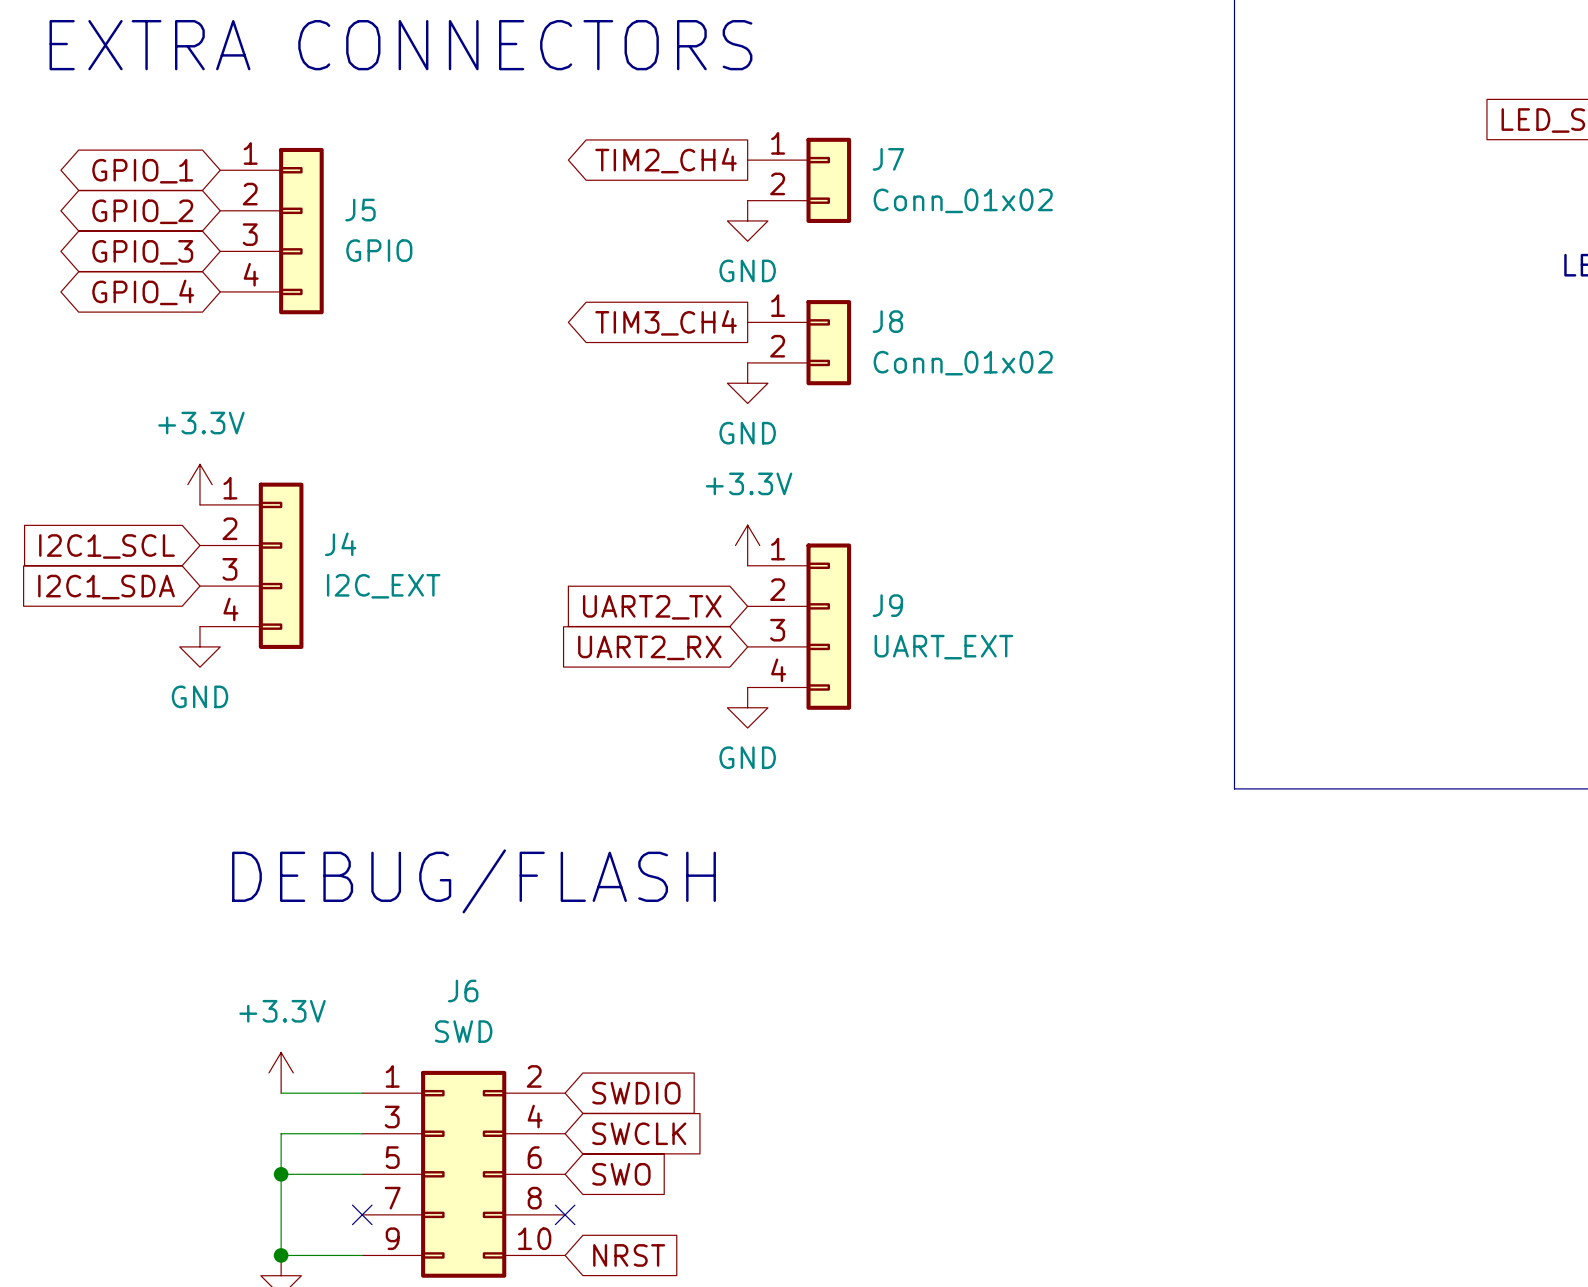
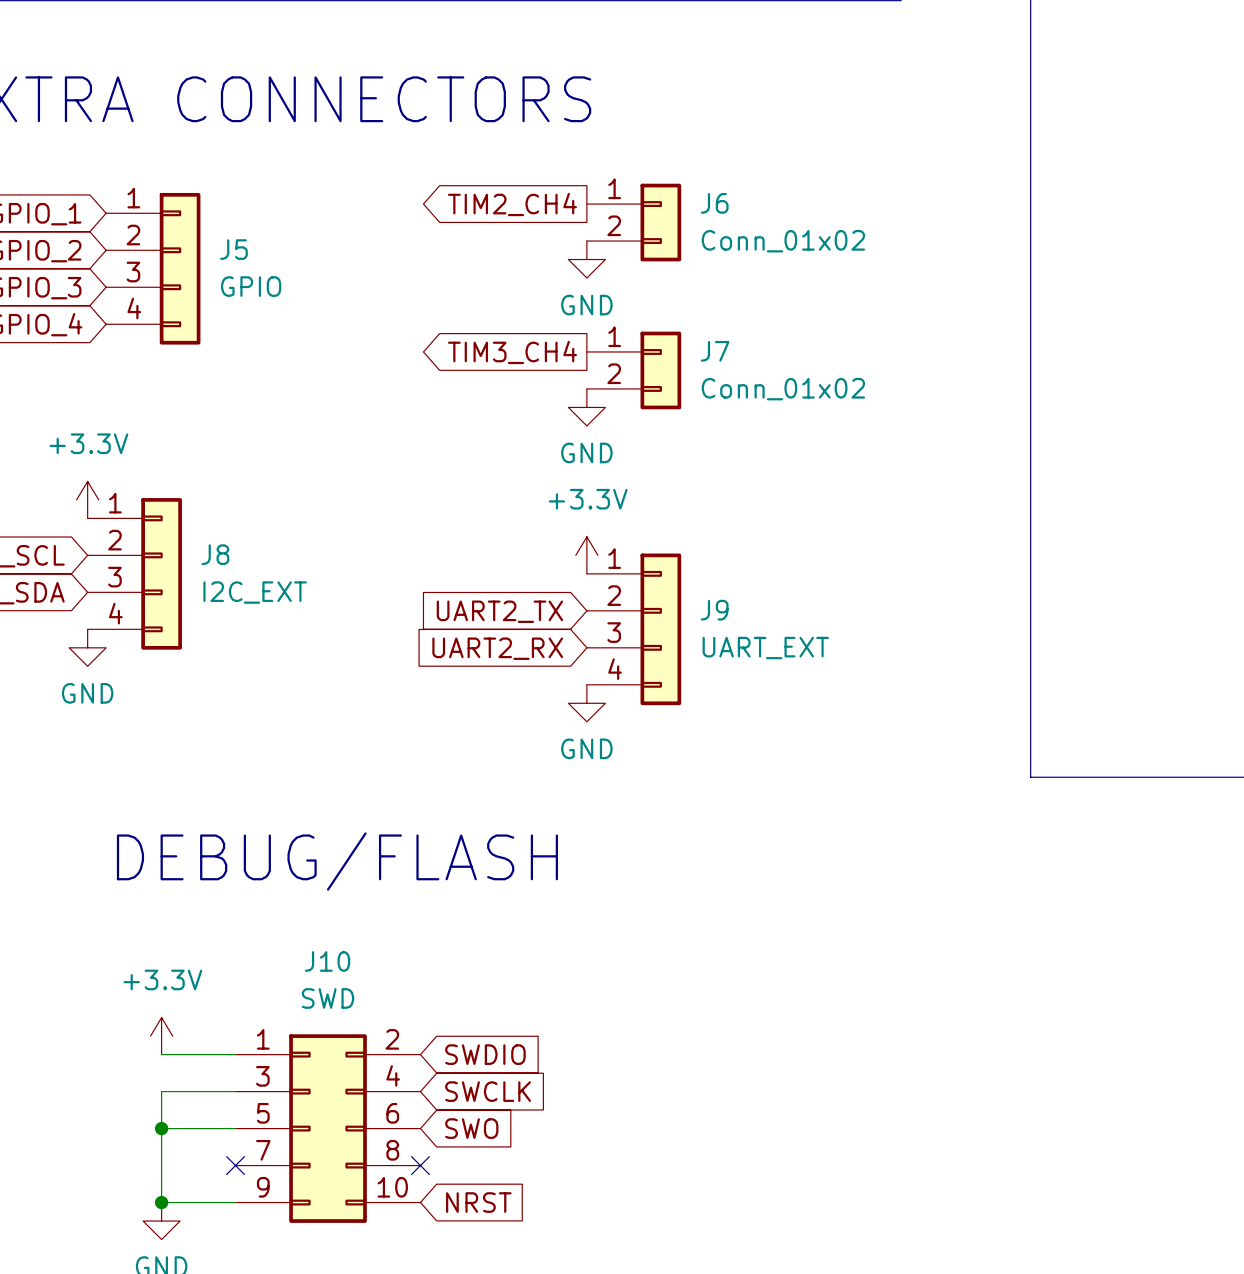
J7 name: J7 (888, 159) -> J6 (714, 203)
J8 name: J8 (887, 321) -> J7 (715, 351)
J4 name: J4 (340, 544) -> J8 (215, 554)
J6 name: J6 (463, 991) -> J10 (327, 961)

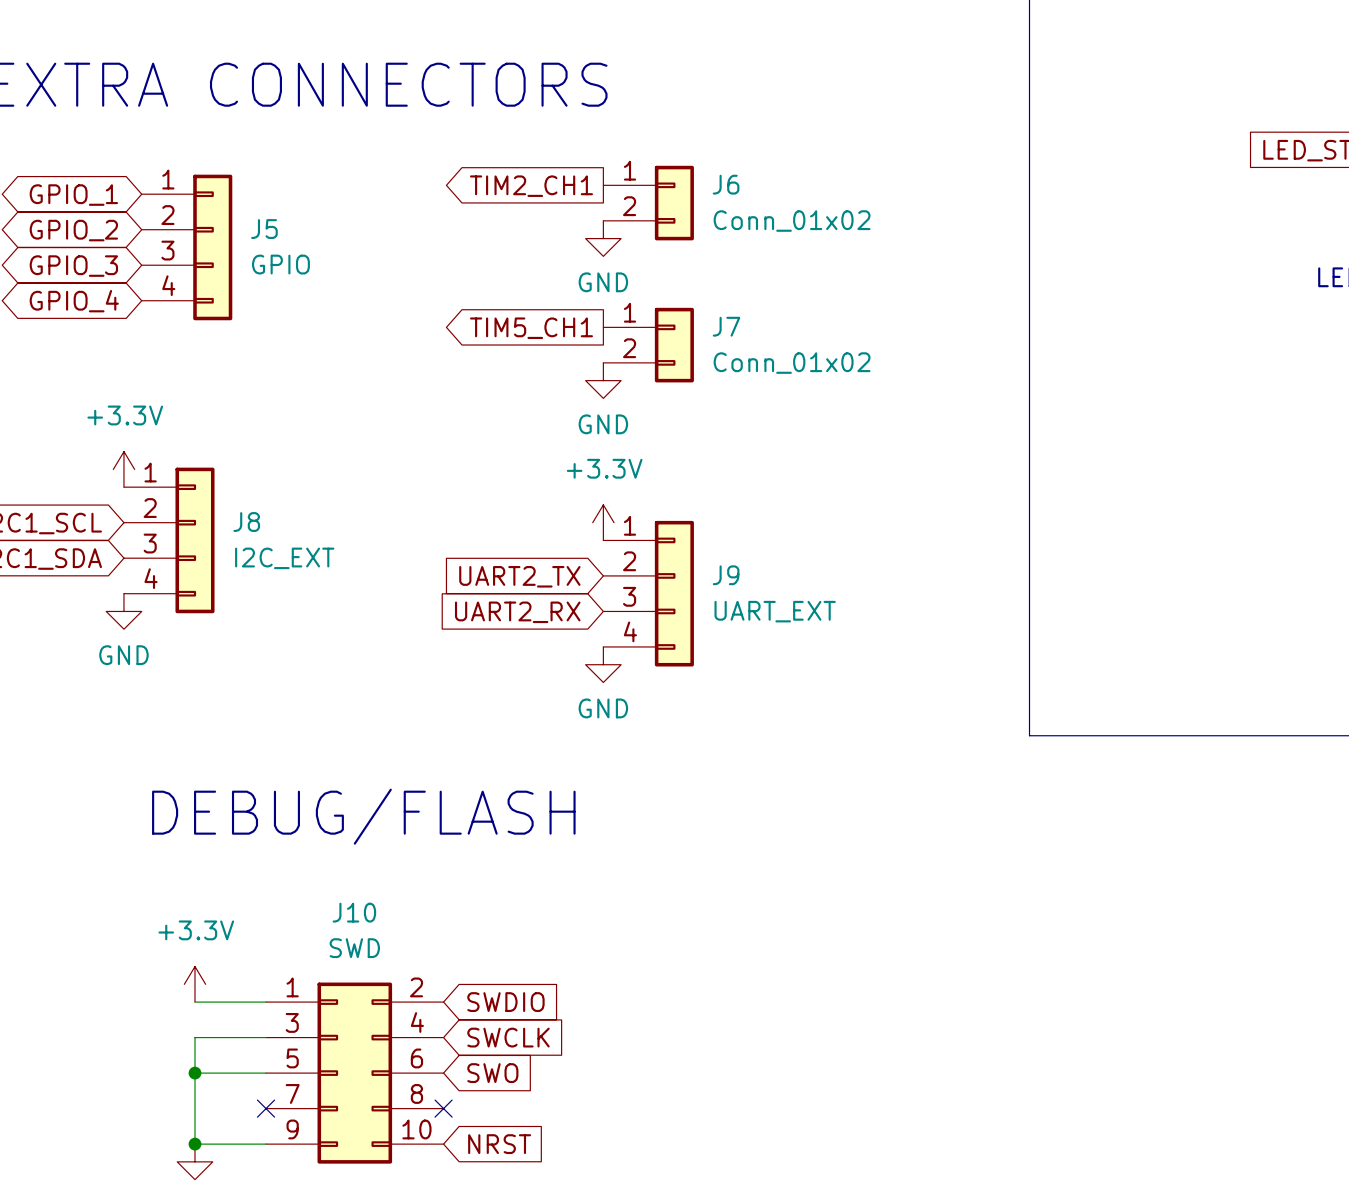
global label: TIM2_CH4 (512, 204) -> TIM2_CH1 (531, 186)
global label: TIM3_CH4 (512, 352) -> TIM5_CH1 (531, 328)

